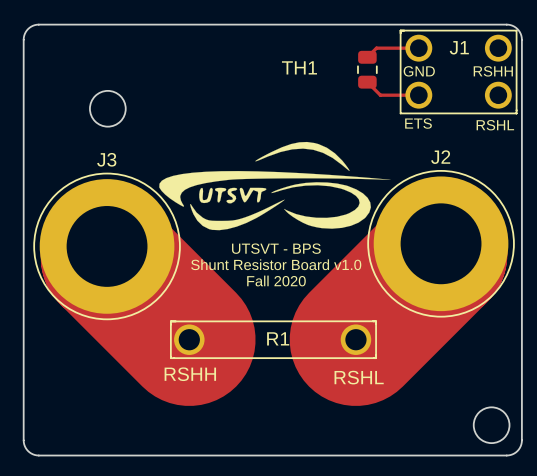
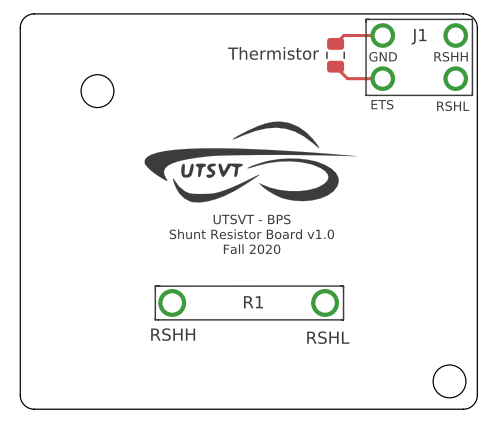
TH1 name: TH1 (299, 67) -> Thermistor (273, 53)
track: (441, 243) (441, 254) (355, 339) -> none
J2: (441, 243) -> none
track: (107, 246) (107, 257) (189, 339) -> none
J3: (107, 246) -> none

